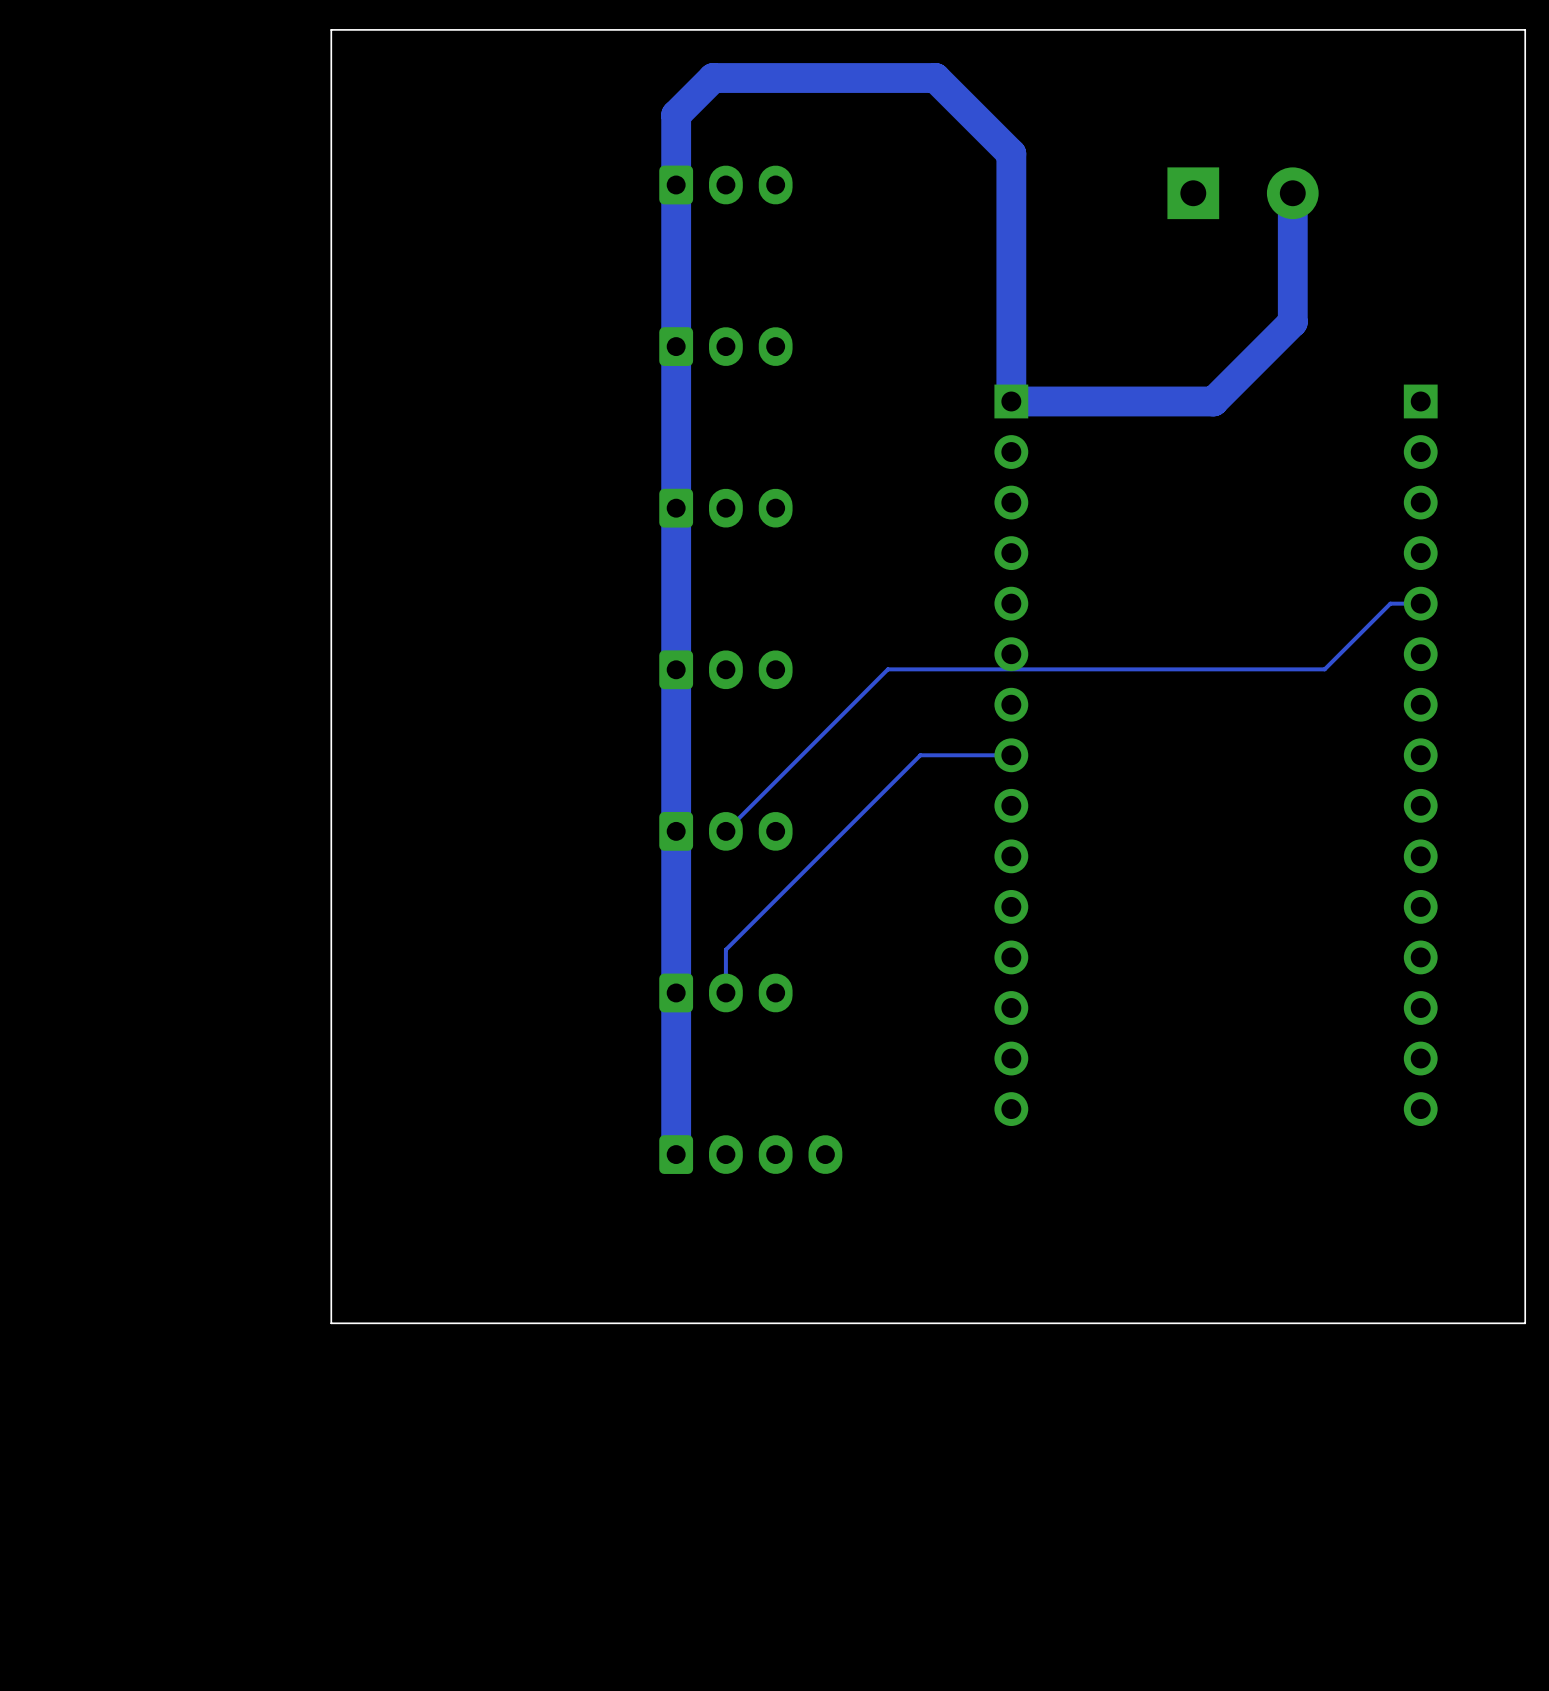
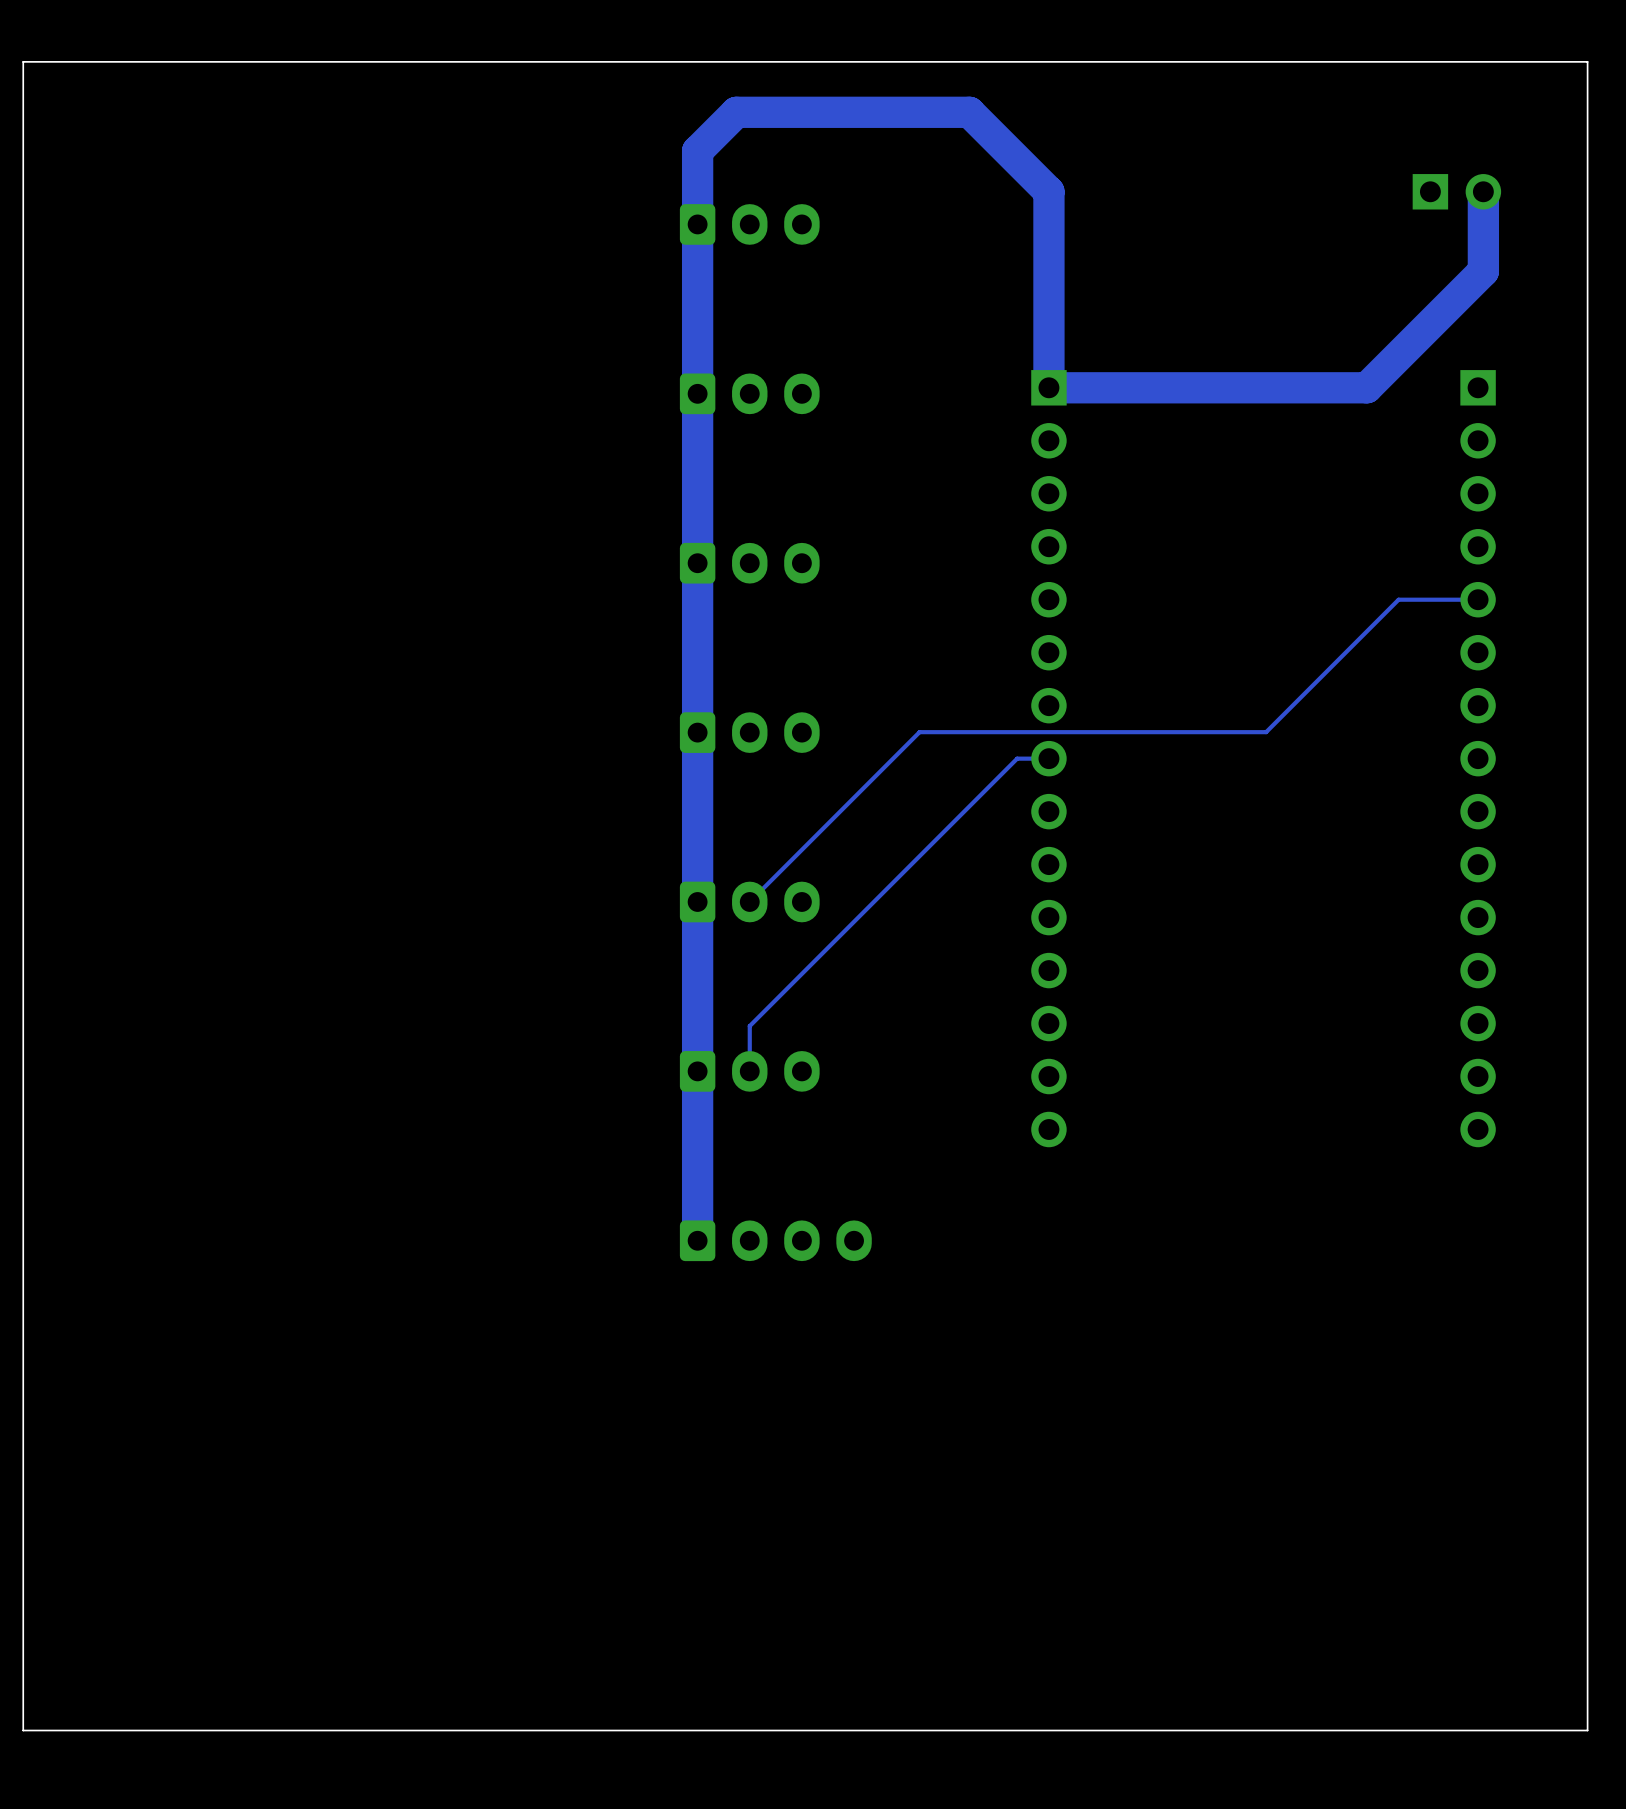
board edge: (331, 29) (331, 1323) (1525, 1323) -> (336, 61) (23, 61) (23, 1730) (1587, 1730) (1587, 1417)
part: none -> (1456, 191)
part: (1243, 193) -> none
track: (1292, 193) (1292, 322) (1213, 401) (1011, 401) (1011, 340) -> (1483, 191) (1483, 271) (1366, 387) (1048, 387)
track: (1420, 603) (1390, 603) (1324, 669) (1218, 669) -> (1478, 599) (1398, 599) (1266, 732)
track: (1011, 745) (1001, 755) (920, 755) -> (1048, 758) (1017, 758) (953, 822)
part position: (1011, 755) -> (1048, 758)
part position: (1420, 755) -> (1478, 758)

